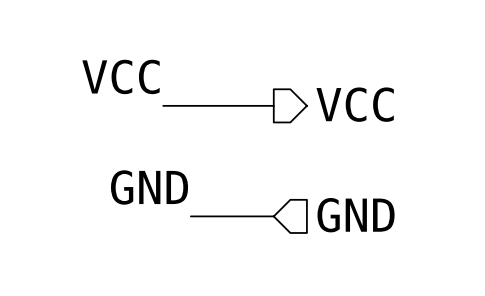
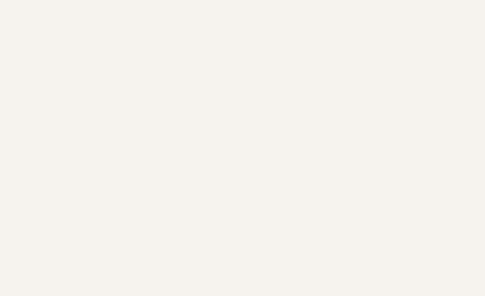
label: VCC (121, 76) -> none
hierarchical label: VCC (355, 104) -> none
wire: (163, 105) (273, 105) -> none
label: GND (149, 187) -> none
hierarchical label: GND (356, 215) -> none
wire: (190, 216) (273, 216) -> none

